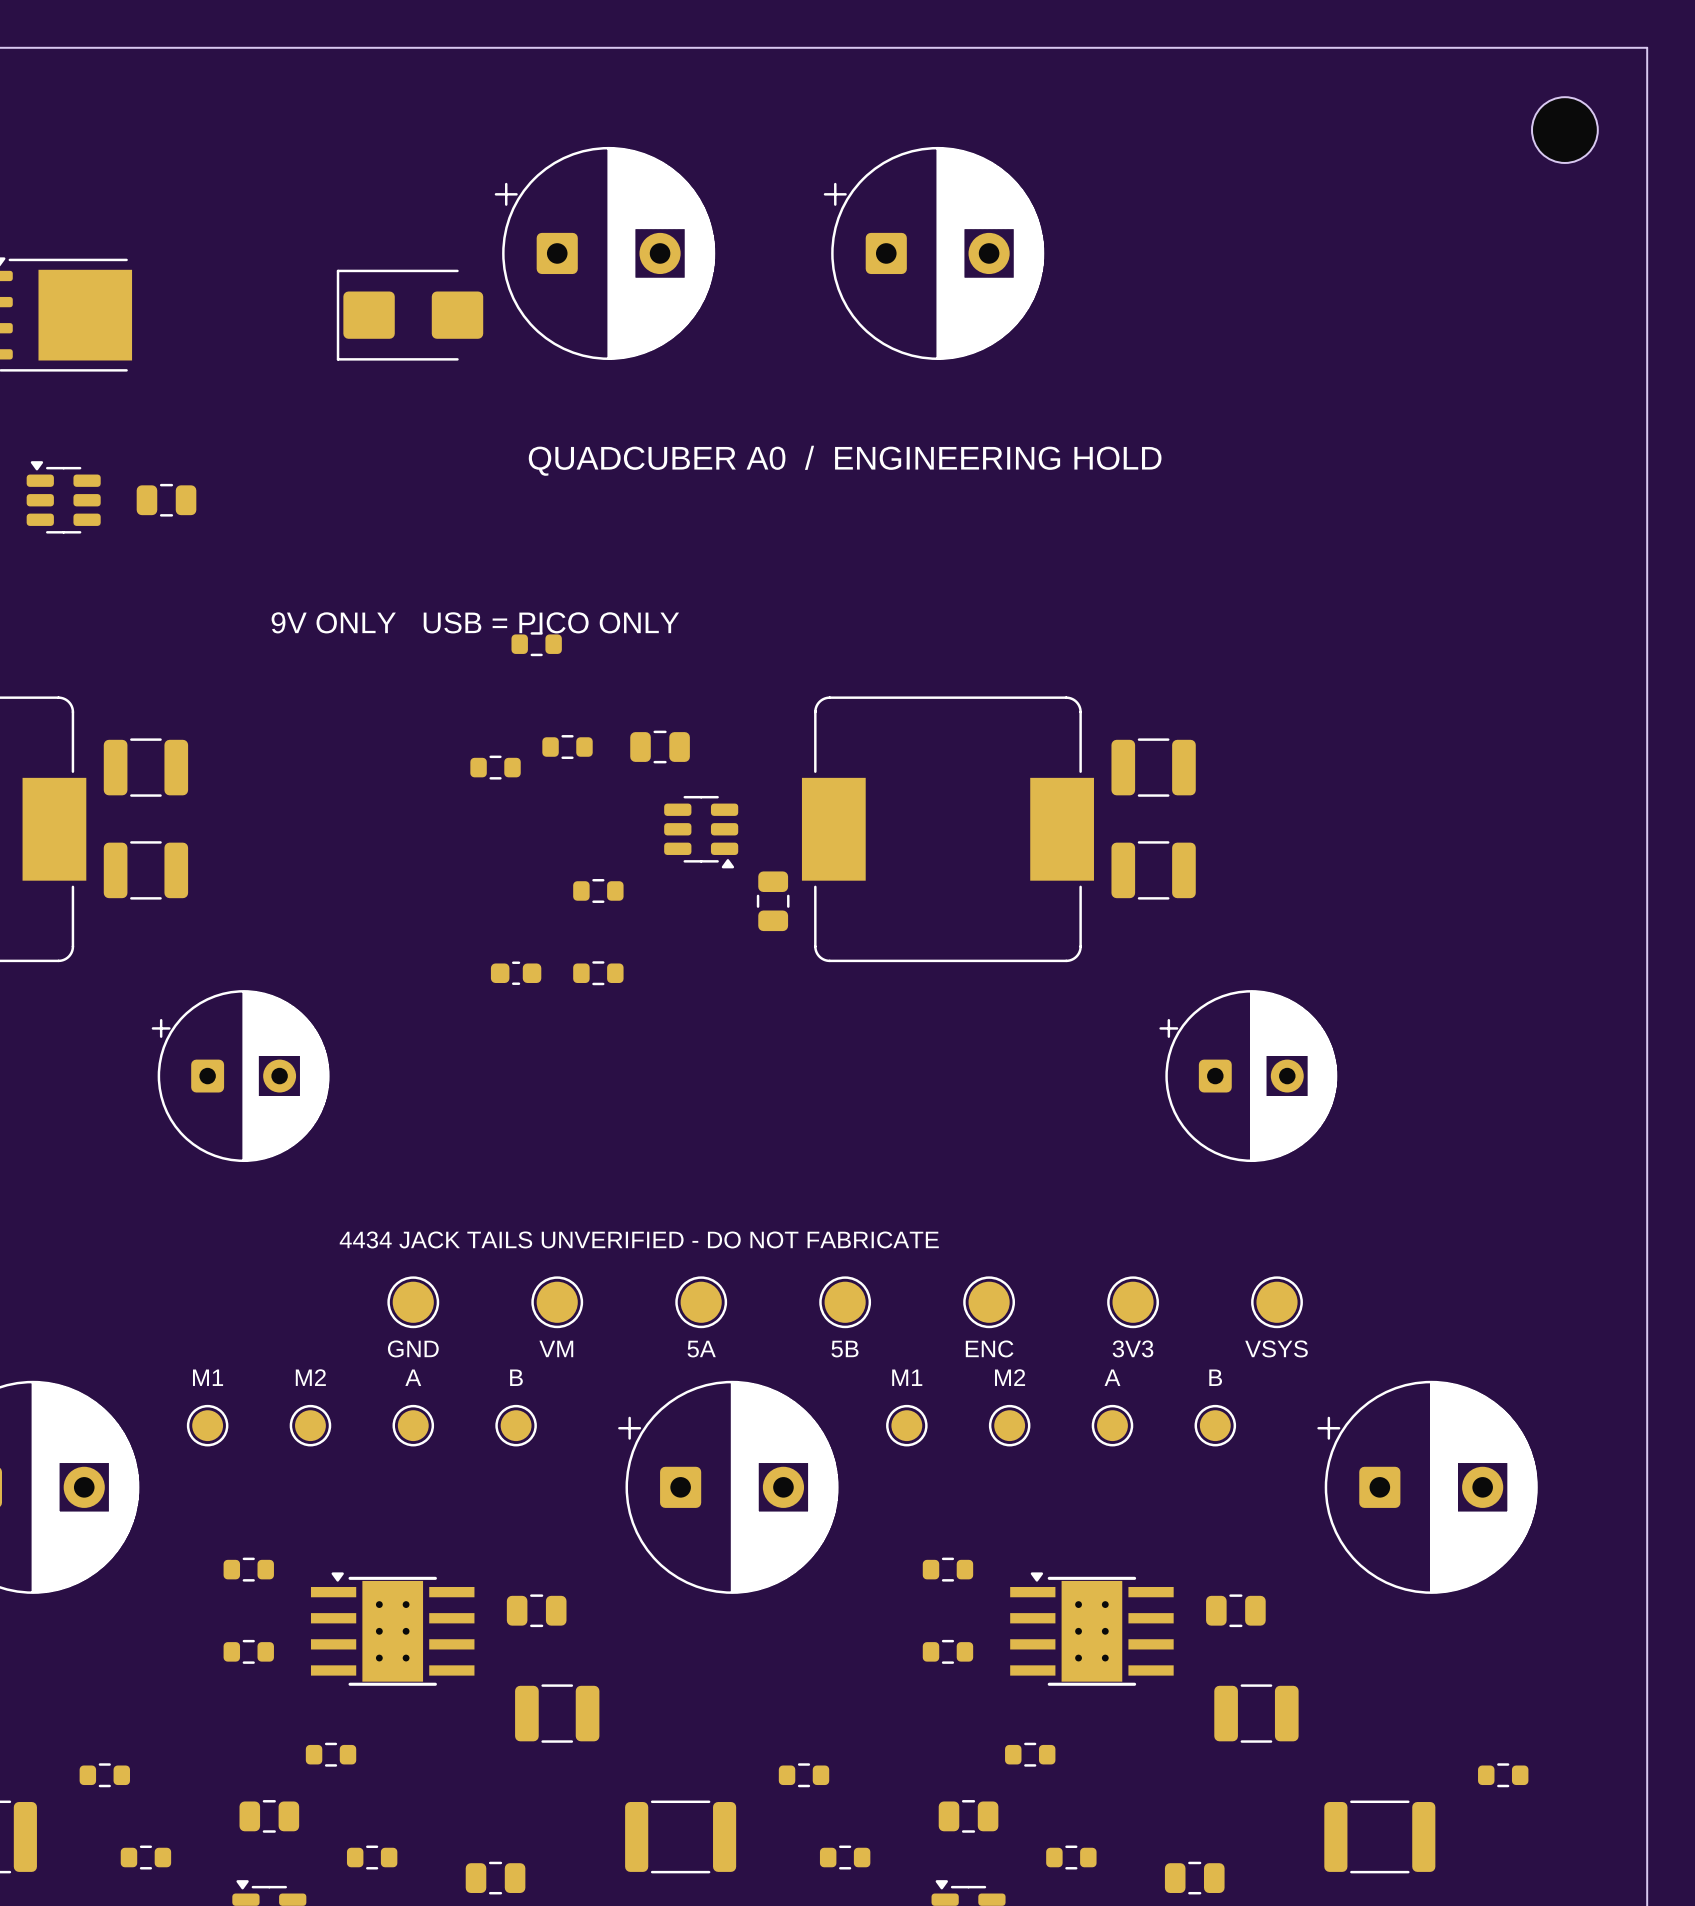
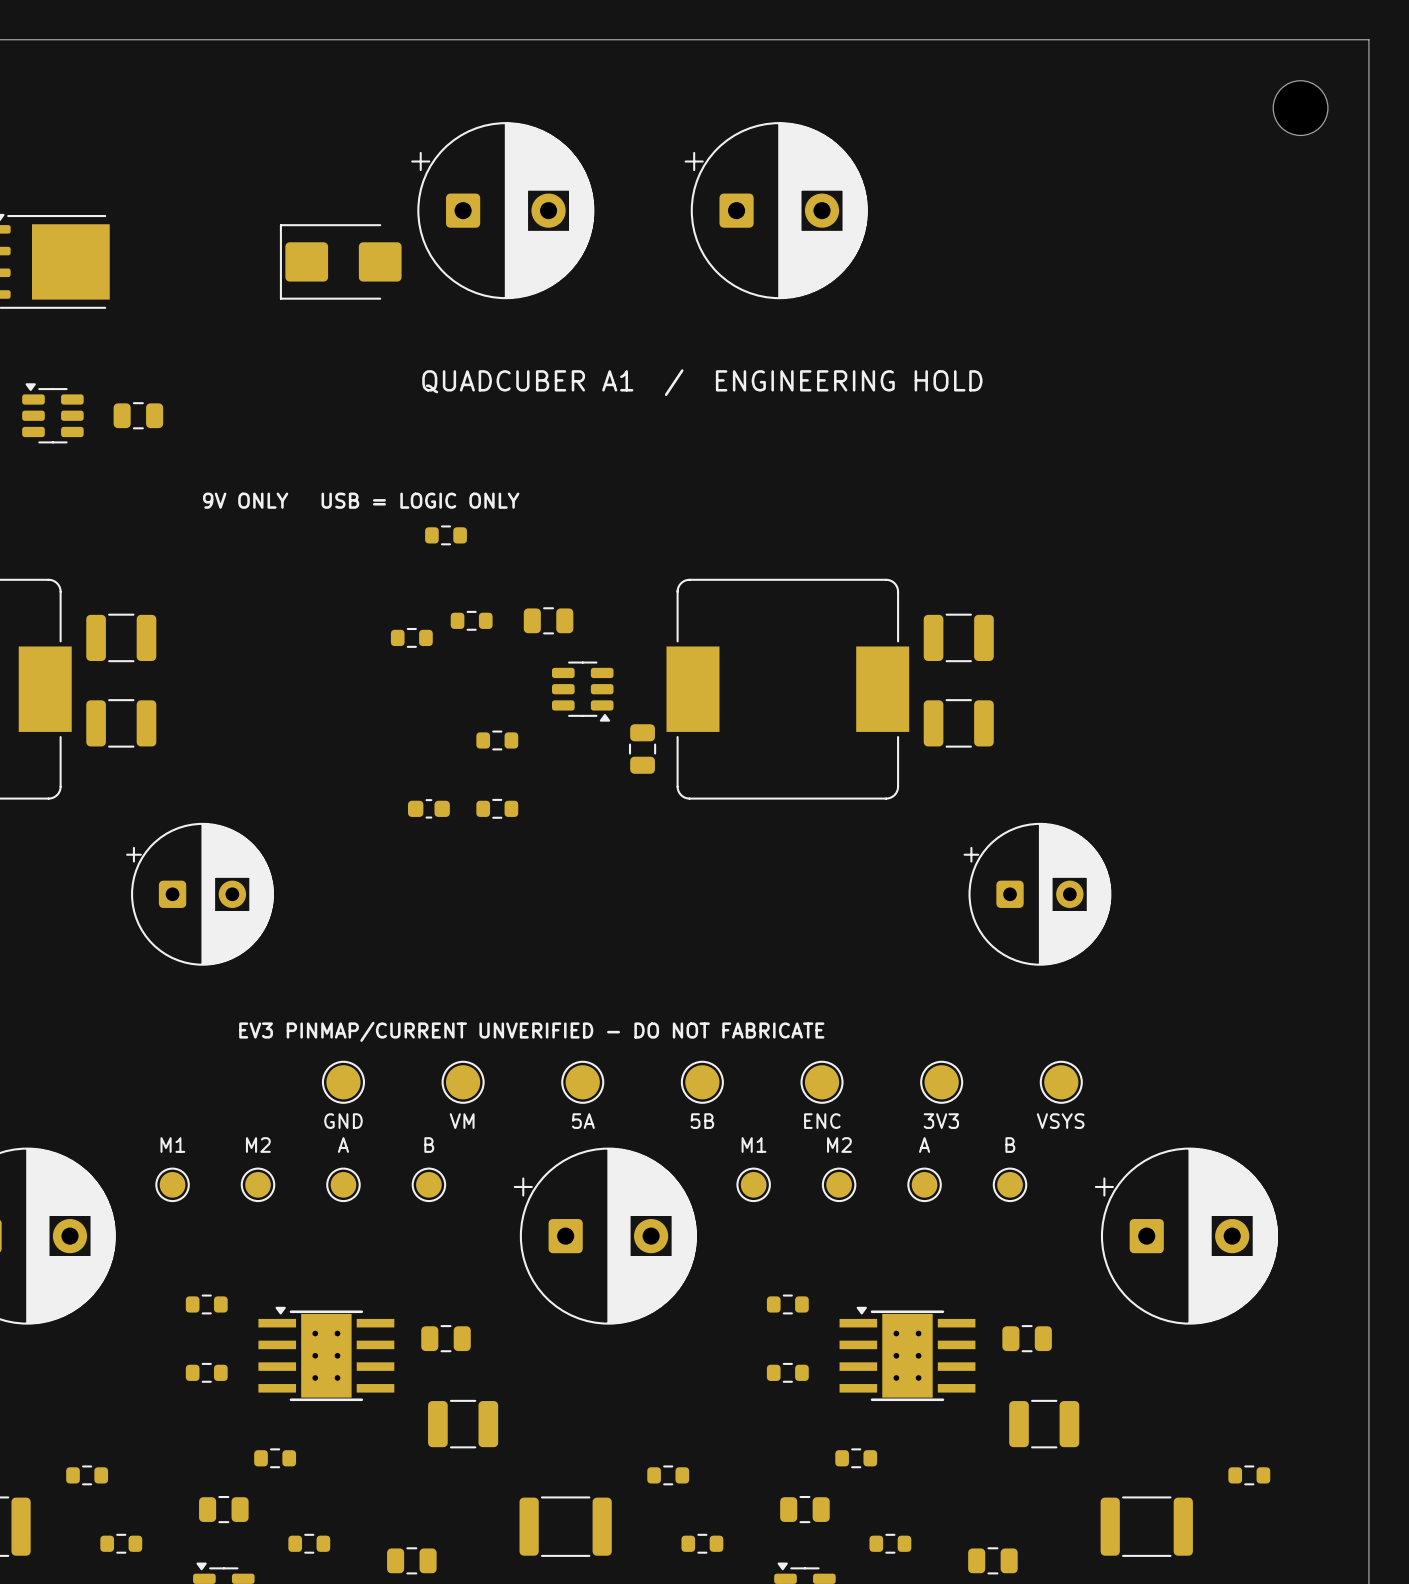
text: QUADCUBER A0 / ENGINEERING HOLD (845, 460) -> QUADCUBER A1 / ENGINEERING HOLD (702, 382)
text: 9V ONLY USB = PICO ONLY (475, 622) -> 9V ONLY USB = LOGIC ONLY (361, 500)
text: 4434 JACK TAILS UNVERIFIED - DO NOT FABRICATE (639, 1239) -> EV3 PINMAP/CURRENT UNVERIFIED - DO NOT FABRICATE (531, 1031)

